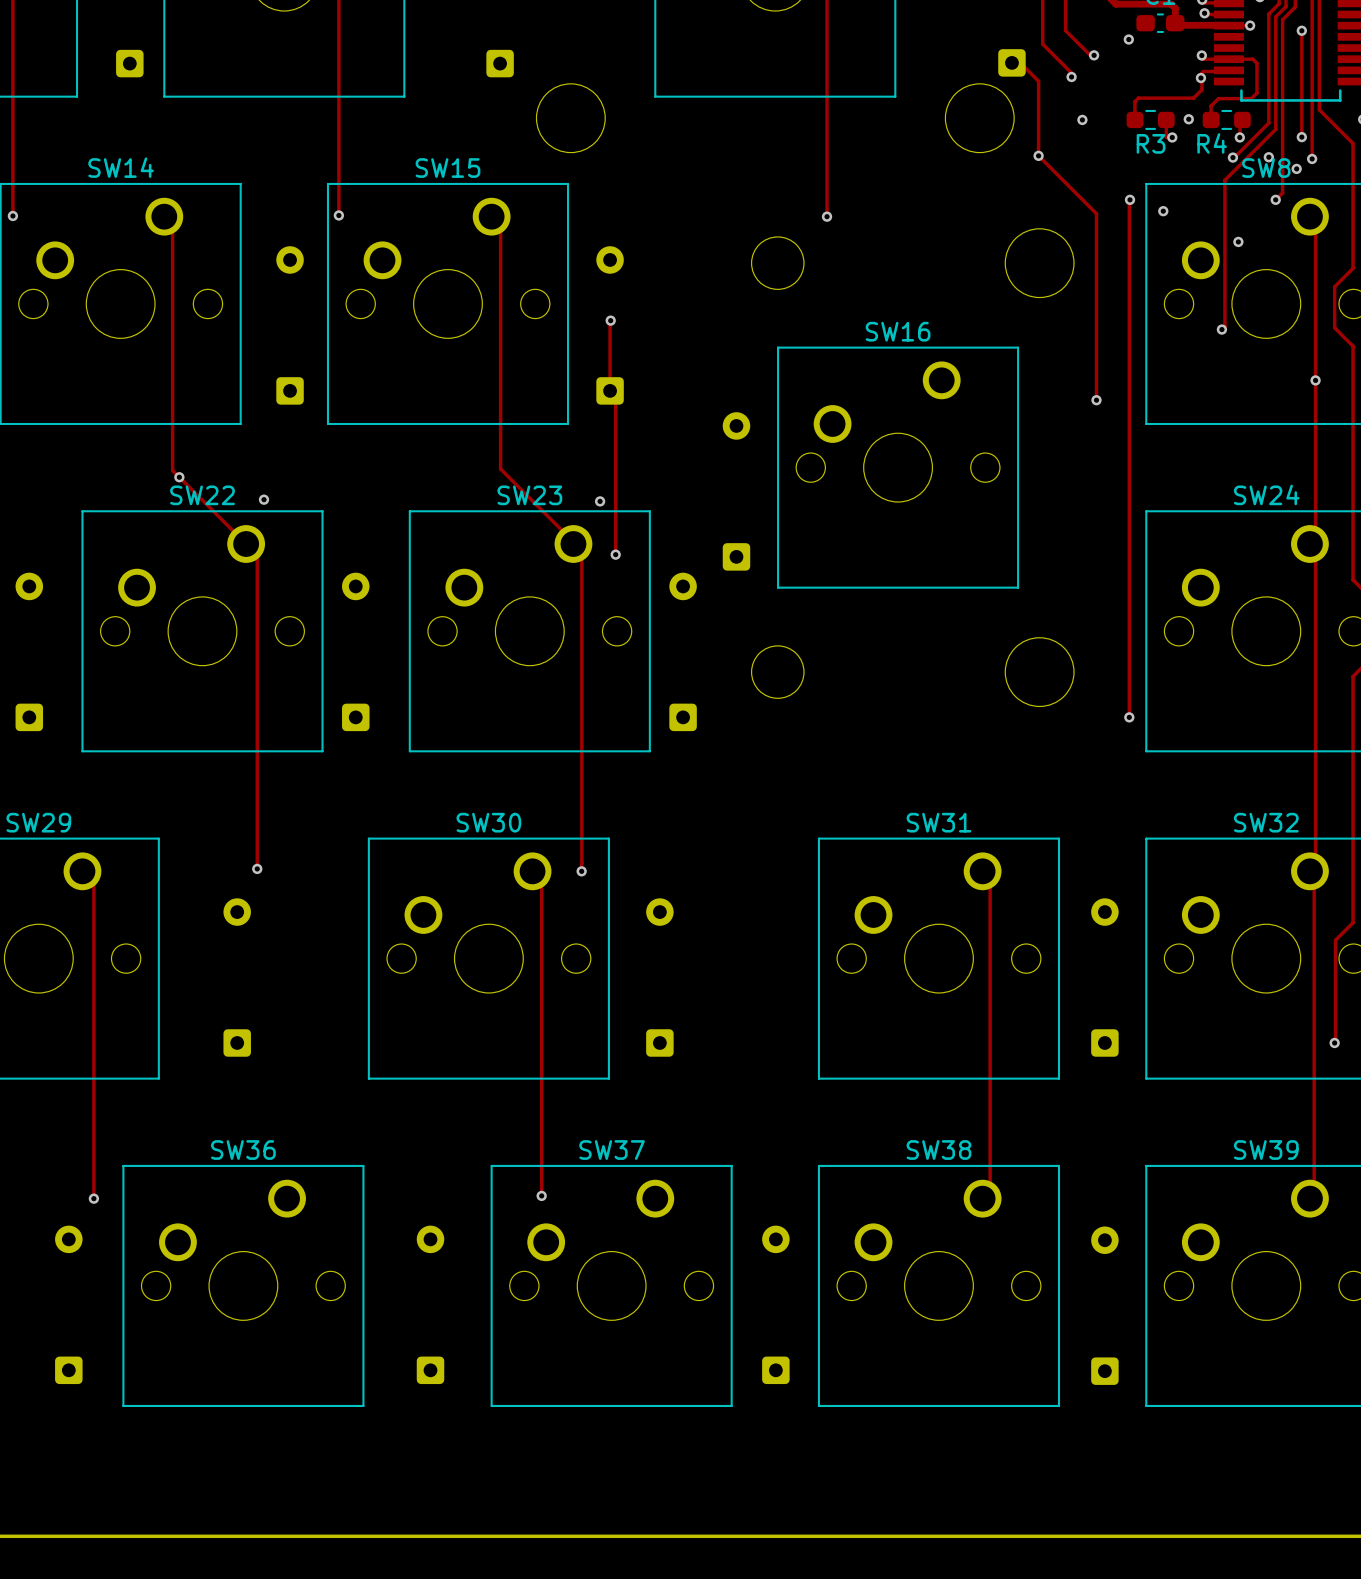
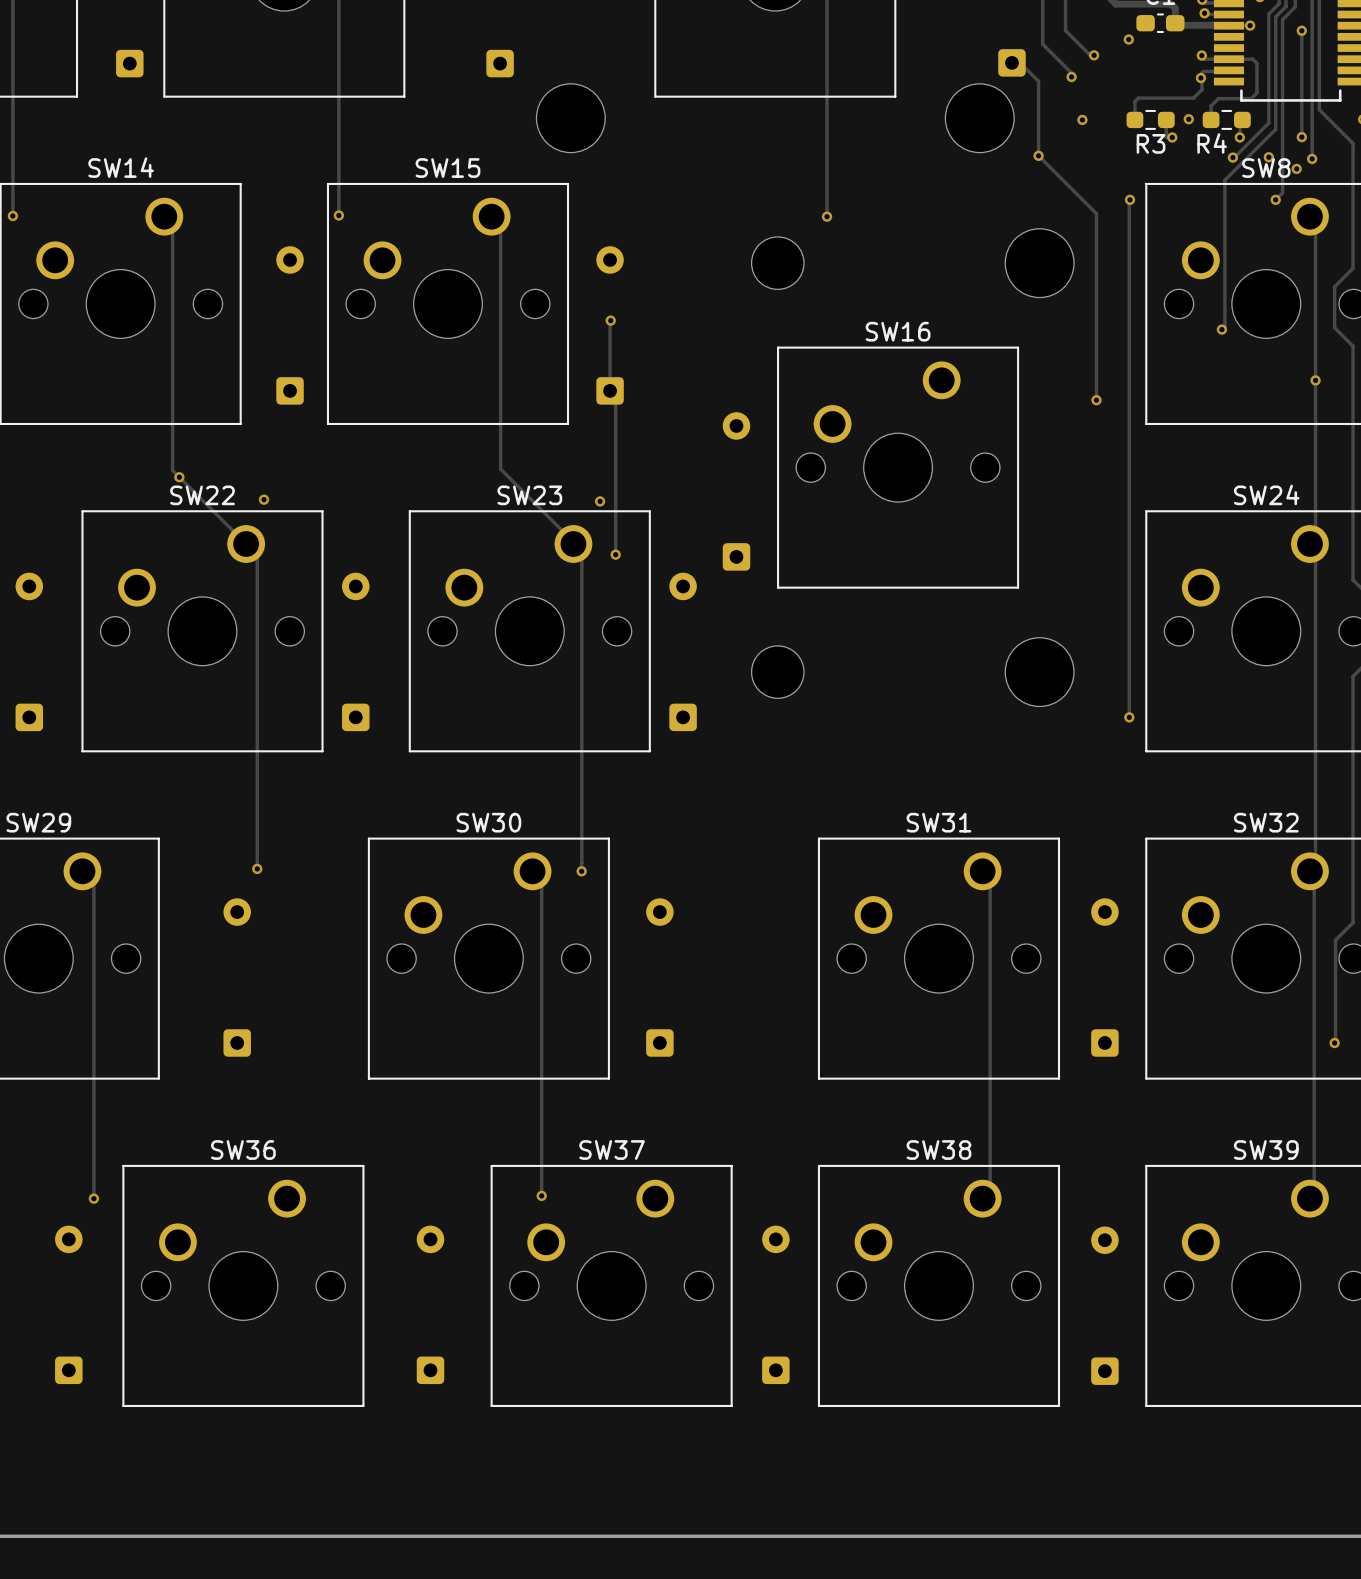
via: (1163, 211) -> none
via: (1238, 241) -> none

